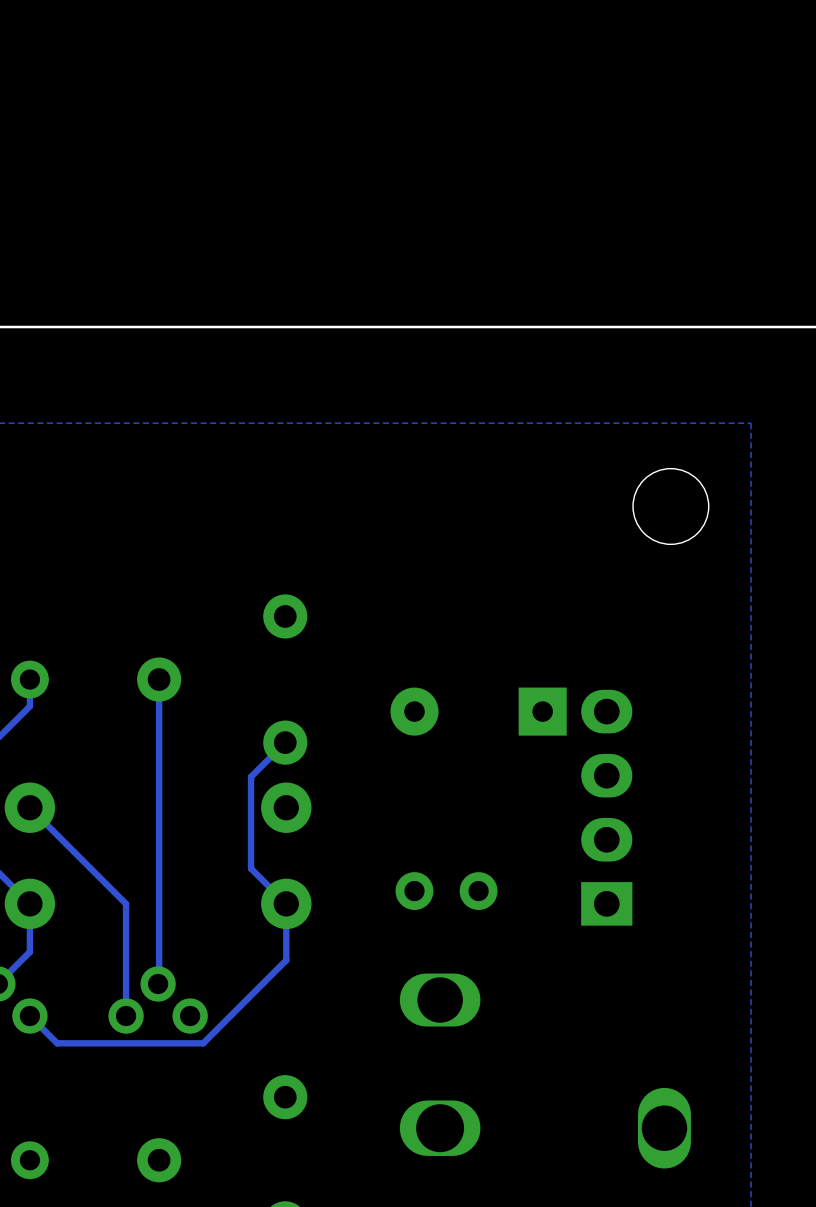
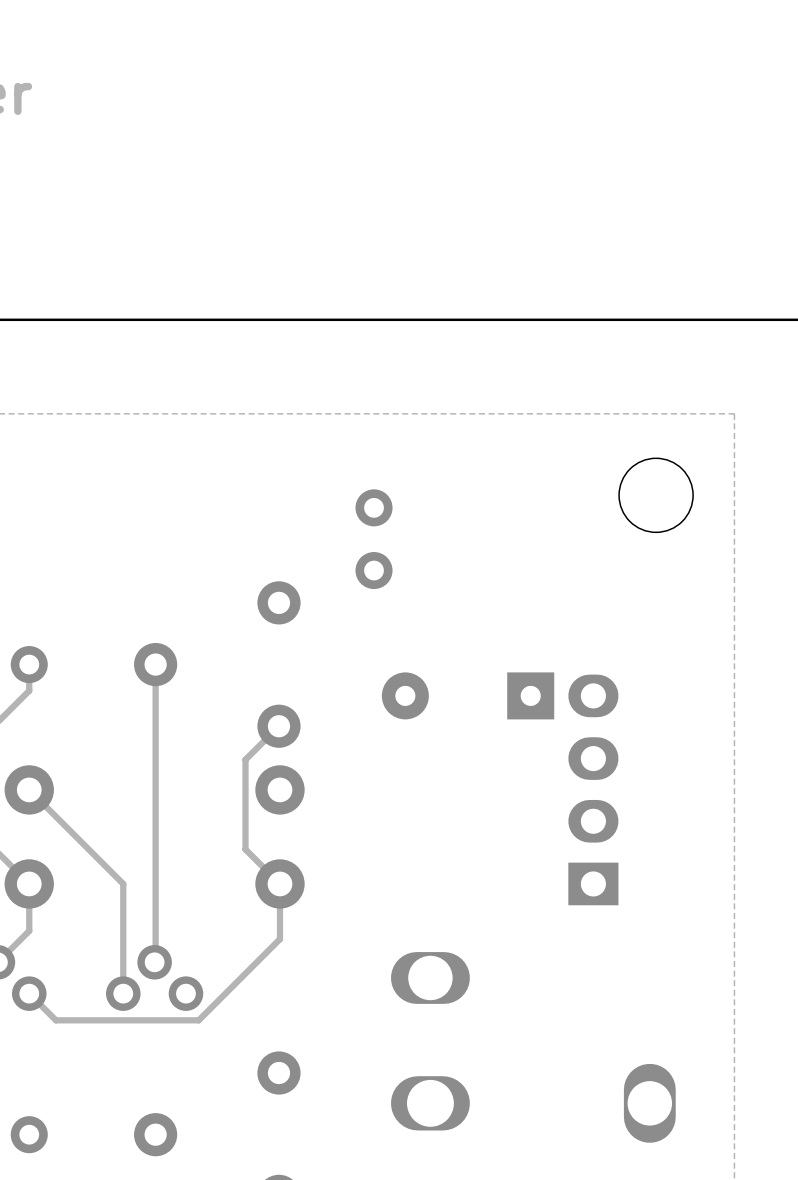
part rotation: 0° (446, 891) -> 90° clockwise (374, 539)
part position: (446, 891) -> (374, 539)

